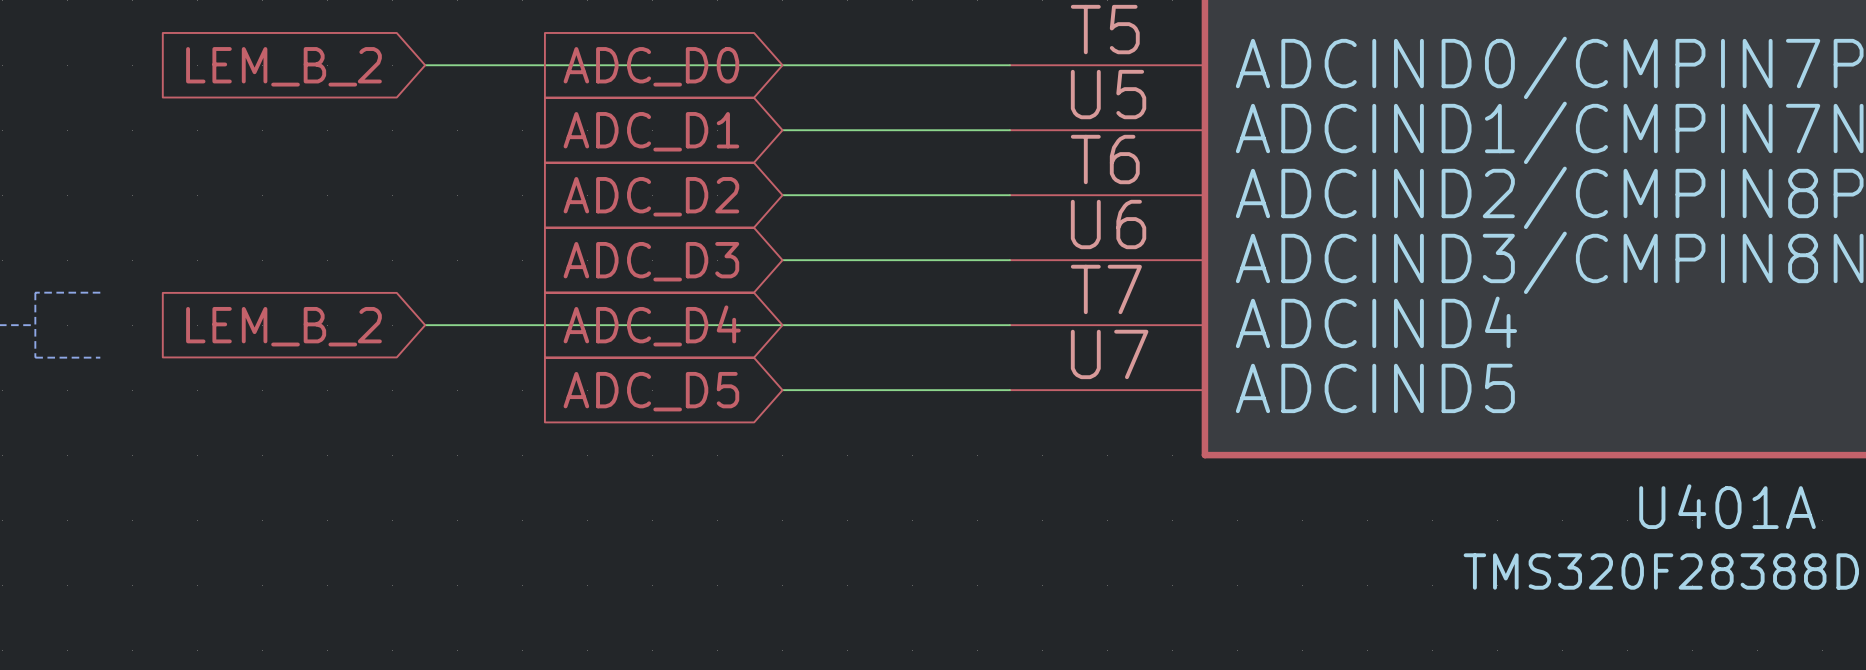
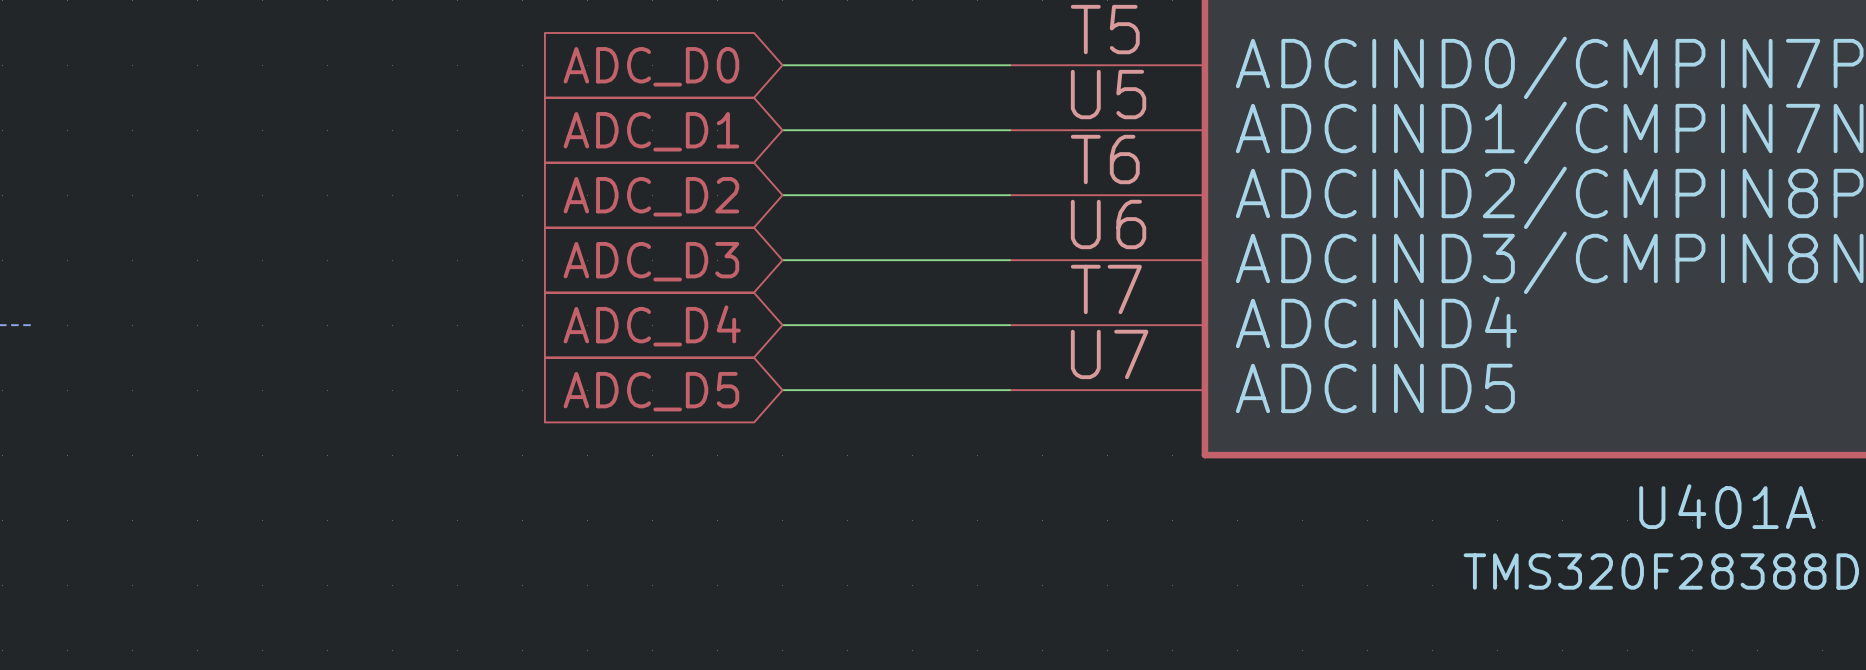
wire: (425, 65) (782, 65) -> none
global label: LEM_B_2 (283, 66) -> none
line: (100, 292) (35, 292) (35, 357) (100, 357) -> none
wire: (425, 325) (782, 325) -> none
global label: LEM_B_2 (283, 326) -> none

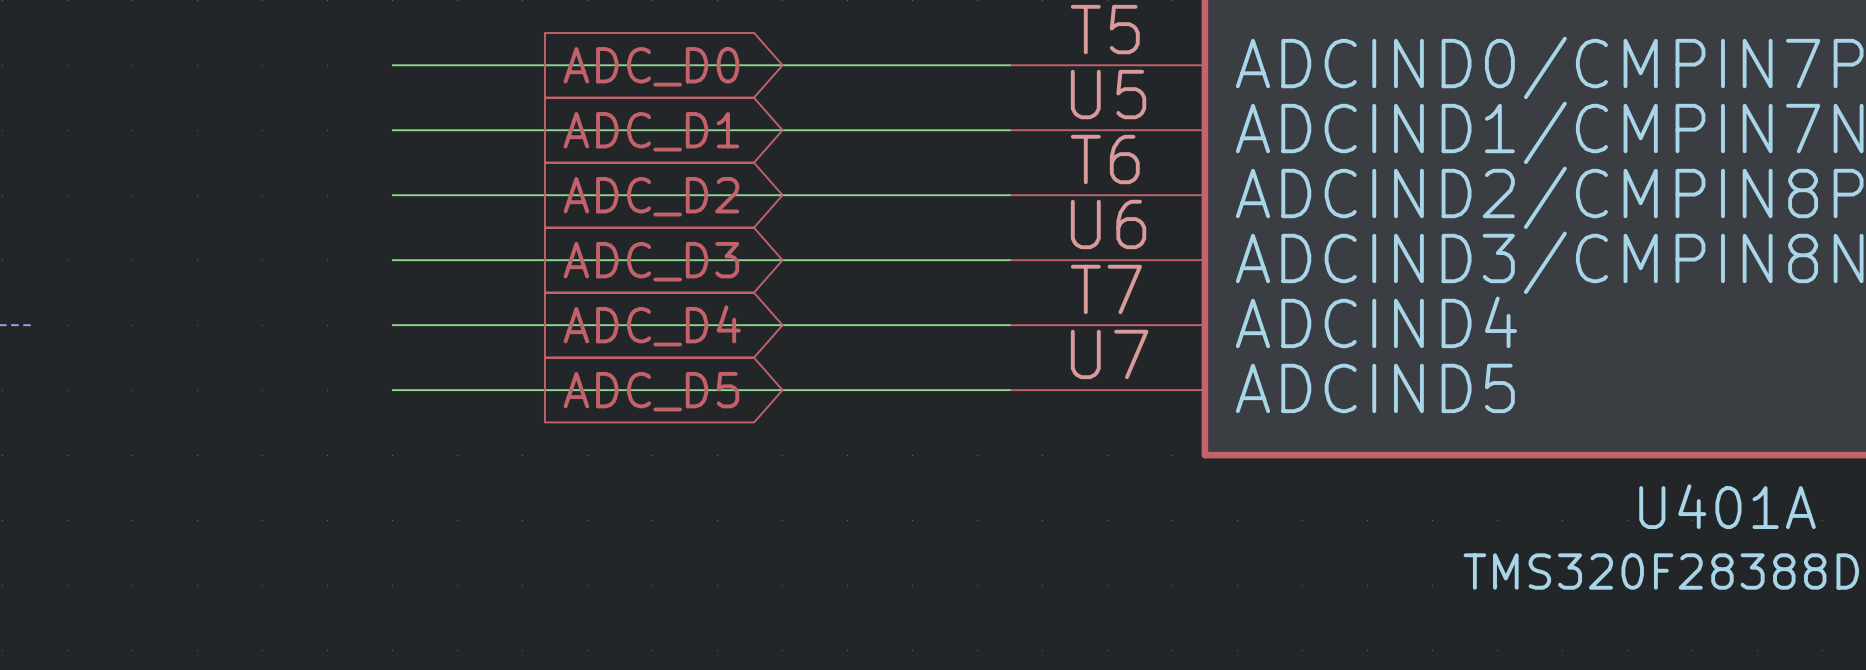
wire: none -> (392, 65) (782, 65)
wire: none -> (392, 130) (782, 130)
wire: none -> (392, 195) (782, 195)
wire: none -> (392, 260) (782, 260)
wire: none -> (392, 325) (782, 325)
wire: none -> (392, 390) (782, 390)

